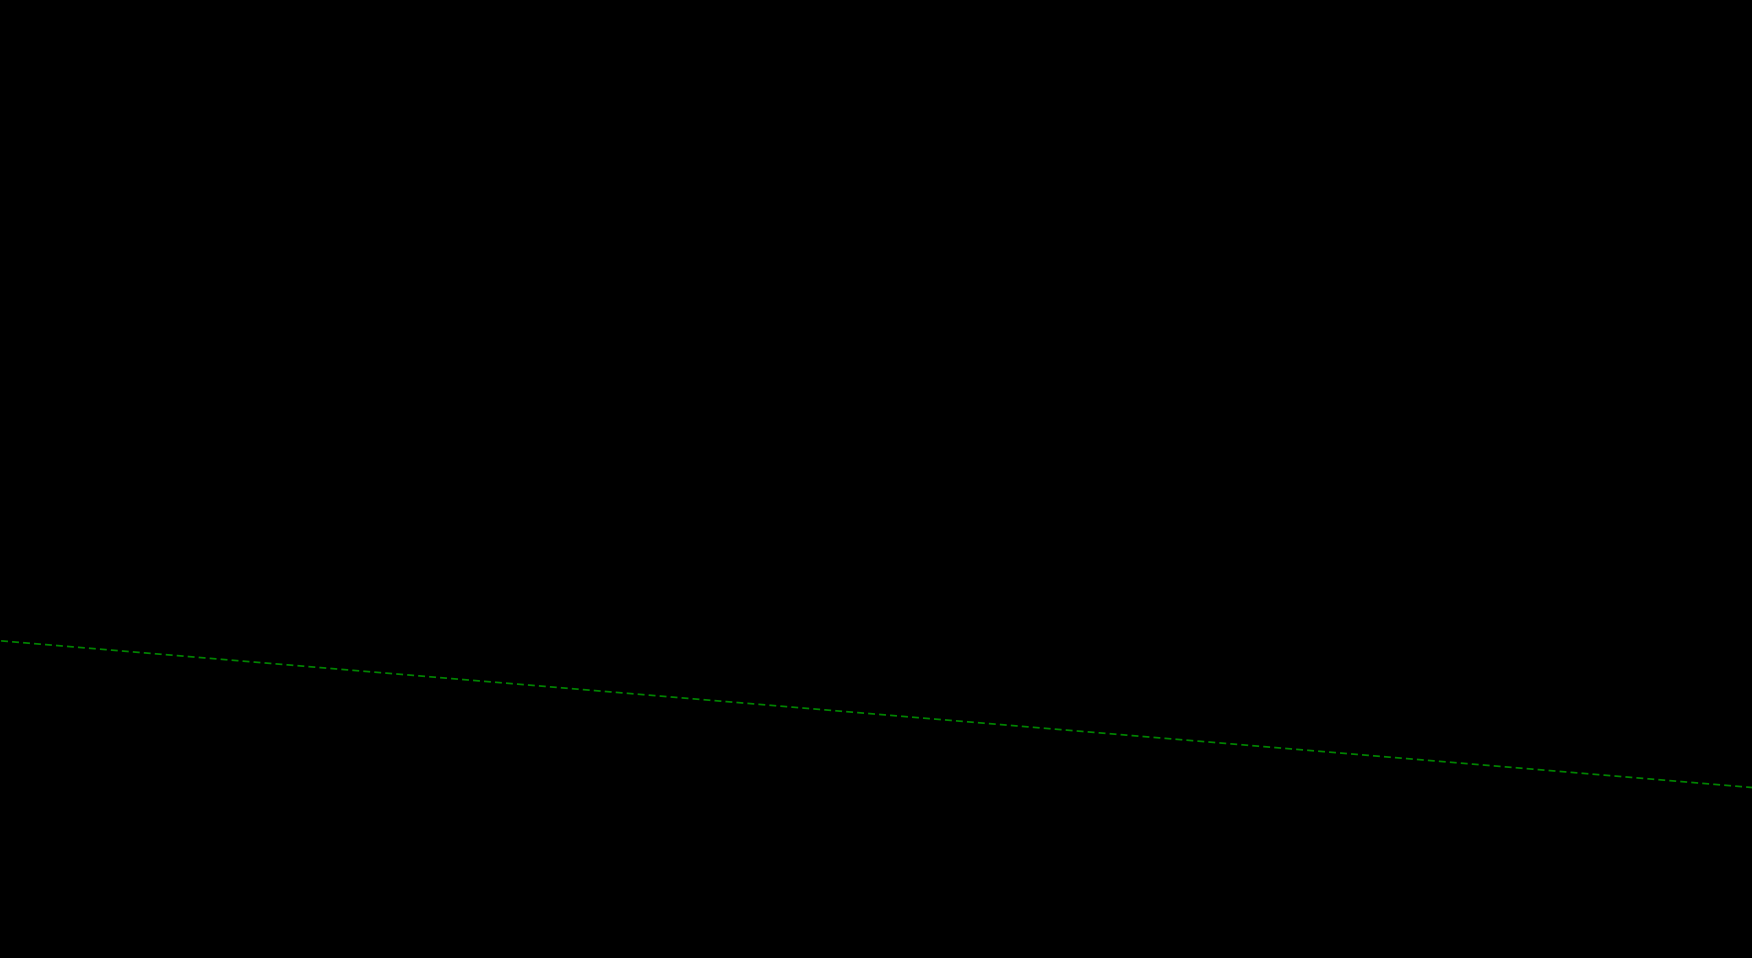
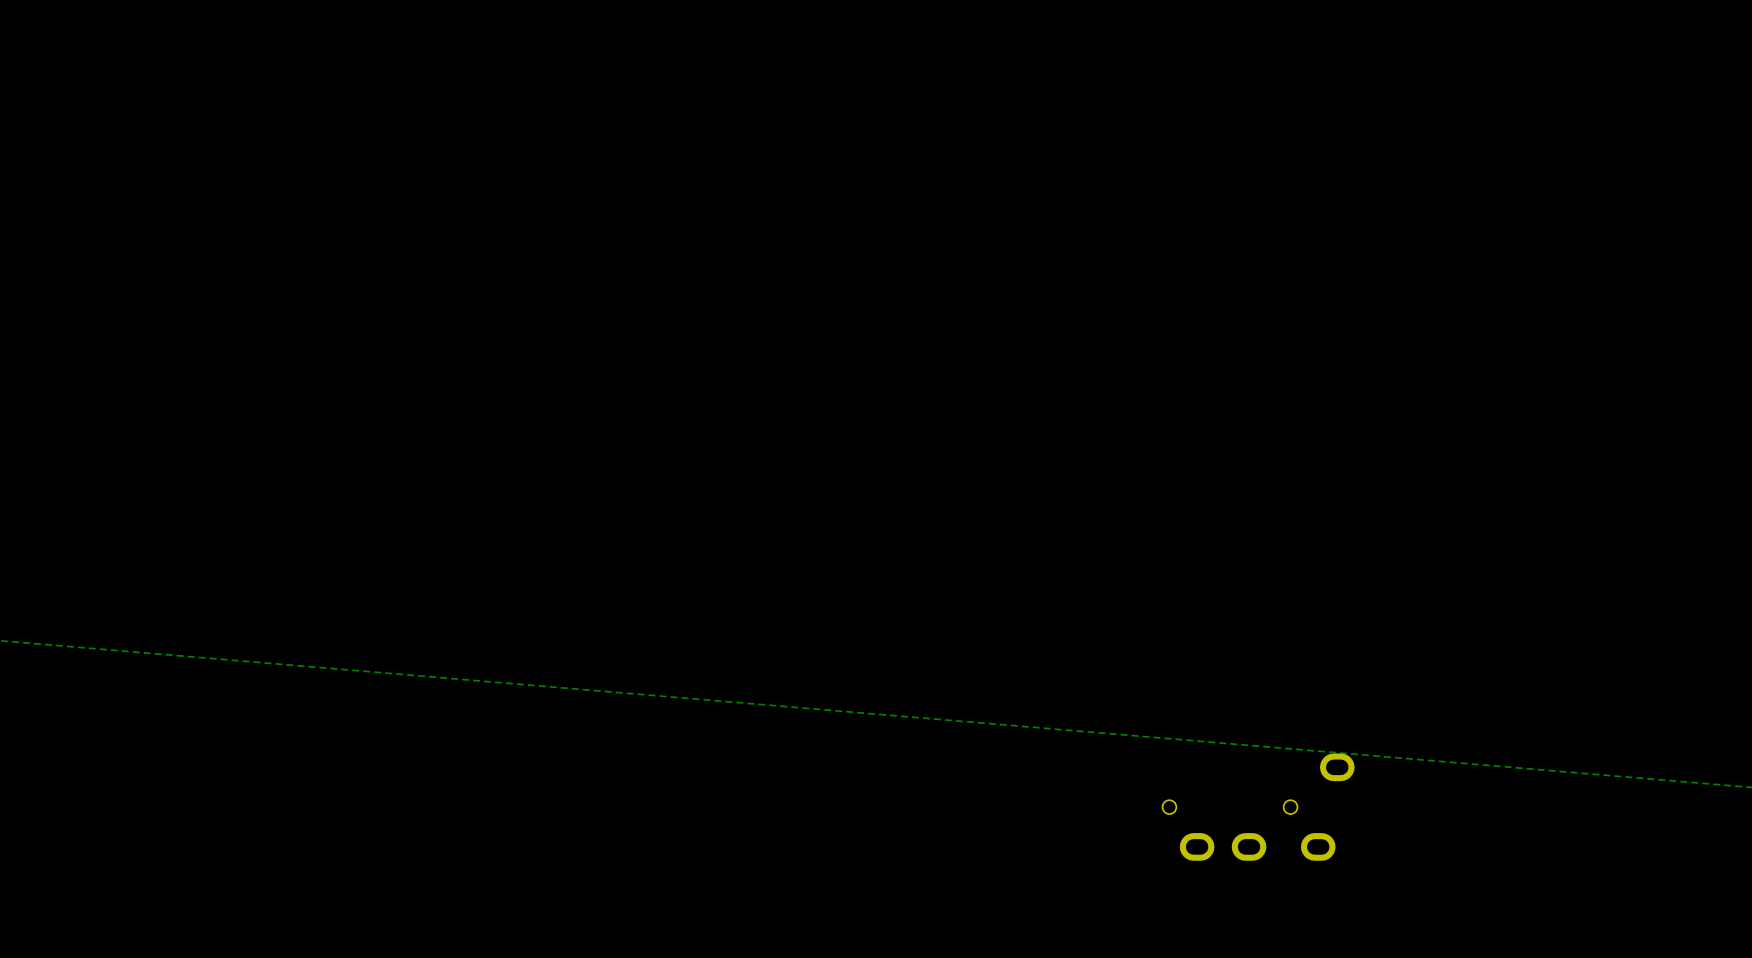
part: none -> (1258, 807)

